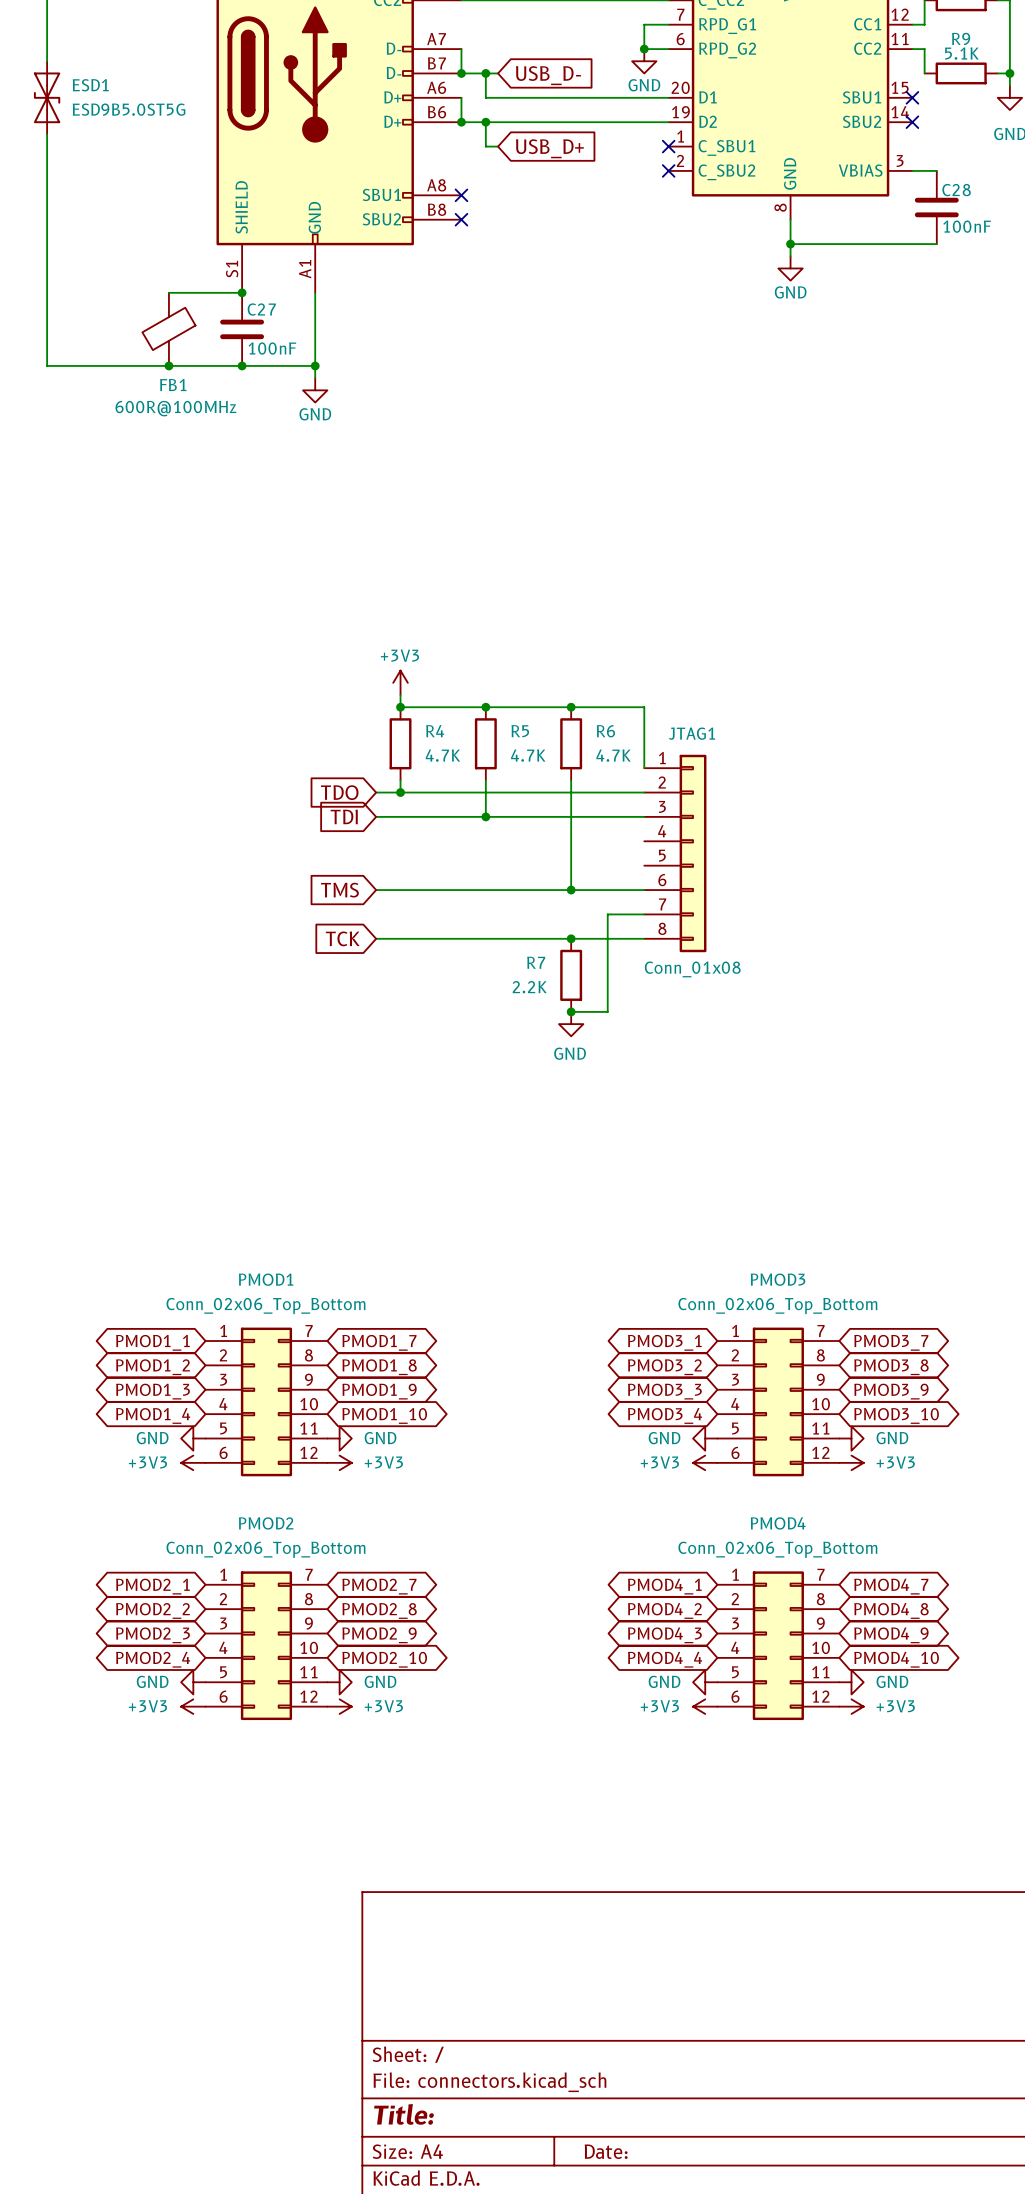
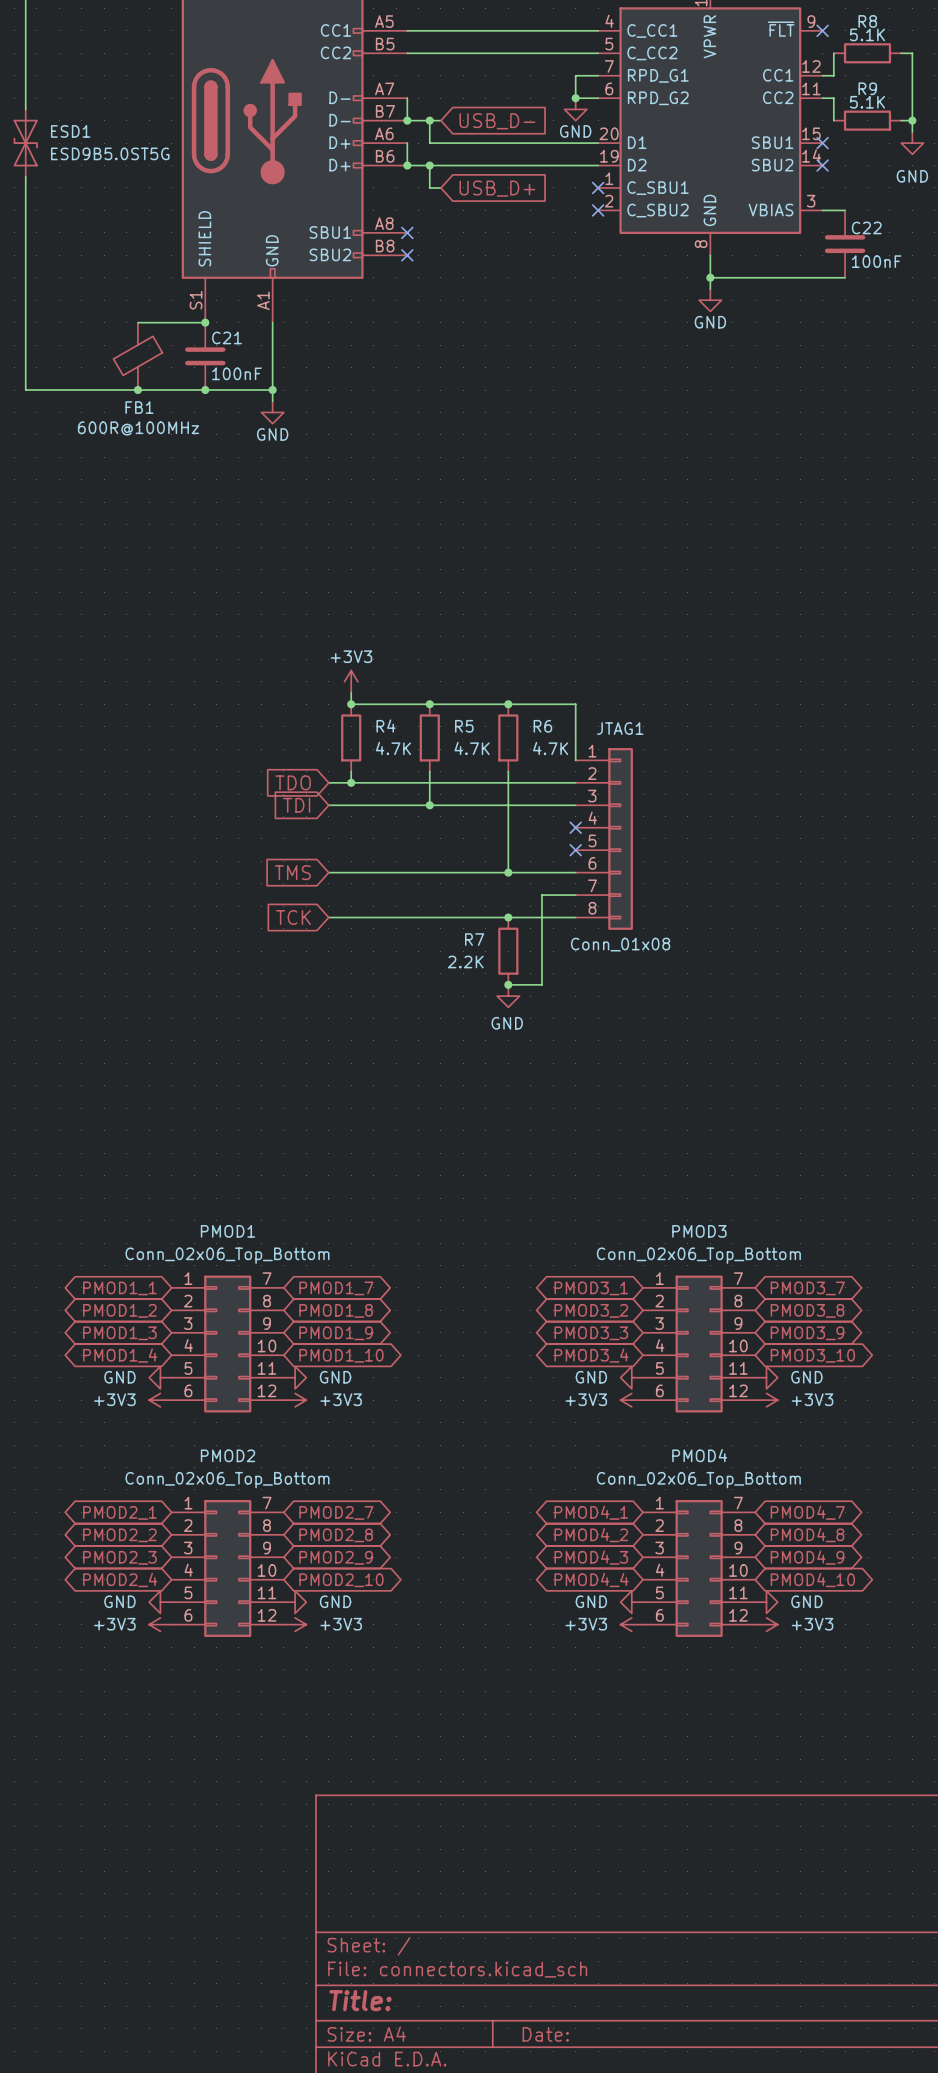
C28 name: C28 (956, 190) -> C22 (866, 227)
C27 name: C27 (261, 309) -> C21 (226, 337)
no-connect mark: none -> (575, 827)
no-connect mark: none -> (575, 850)

